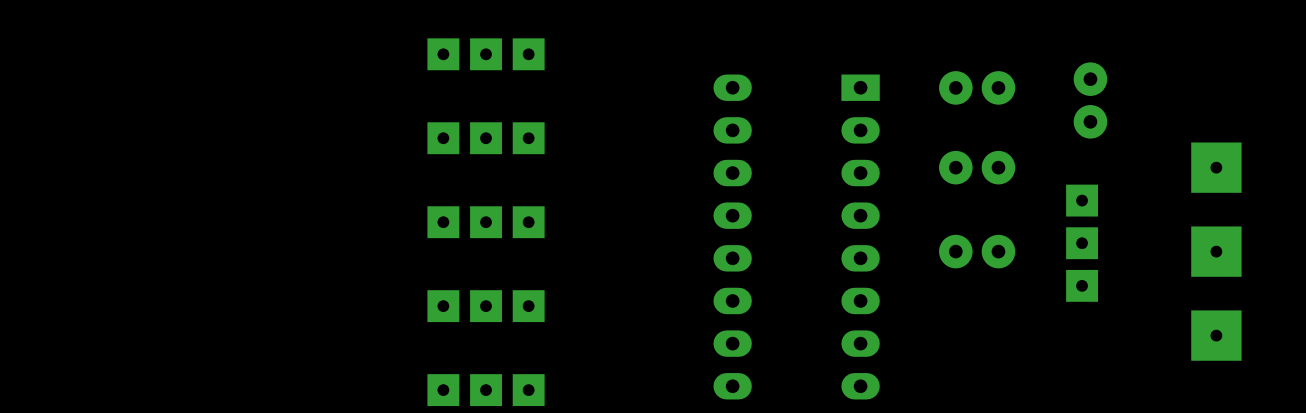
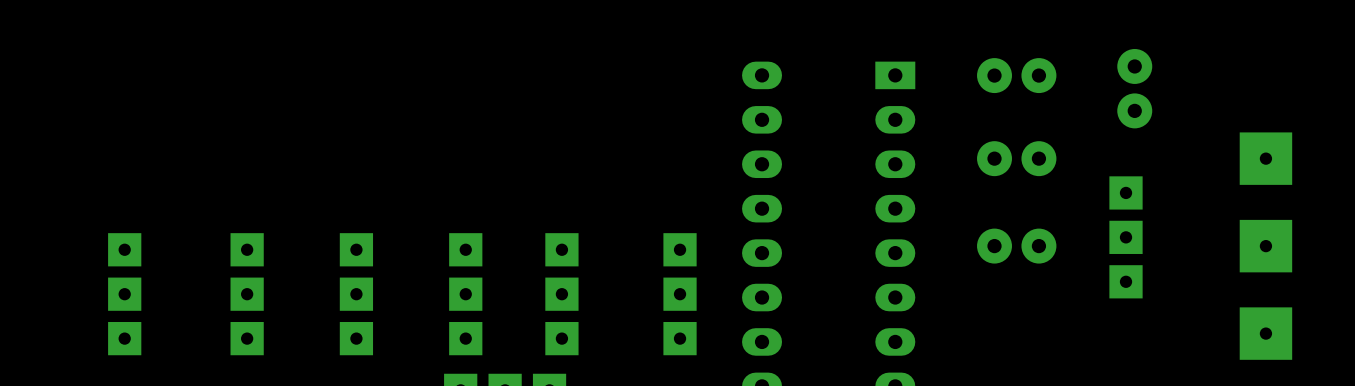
part: (486, 54) -> none
part: (486, 138) -> none
part: (486, 222) -> none
part: none -> (124, 294)
part: none -> (247, 294)
part: none -> (356, 294)
part: none -> (465, 294)
part: none -> (561, 294)
part: none -> (680, 294)
part: (486, 306) -> none

